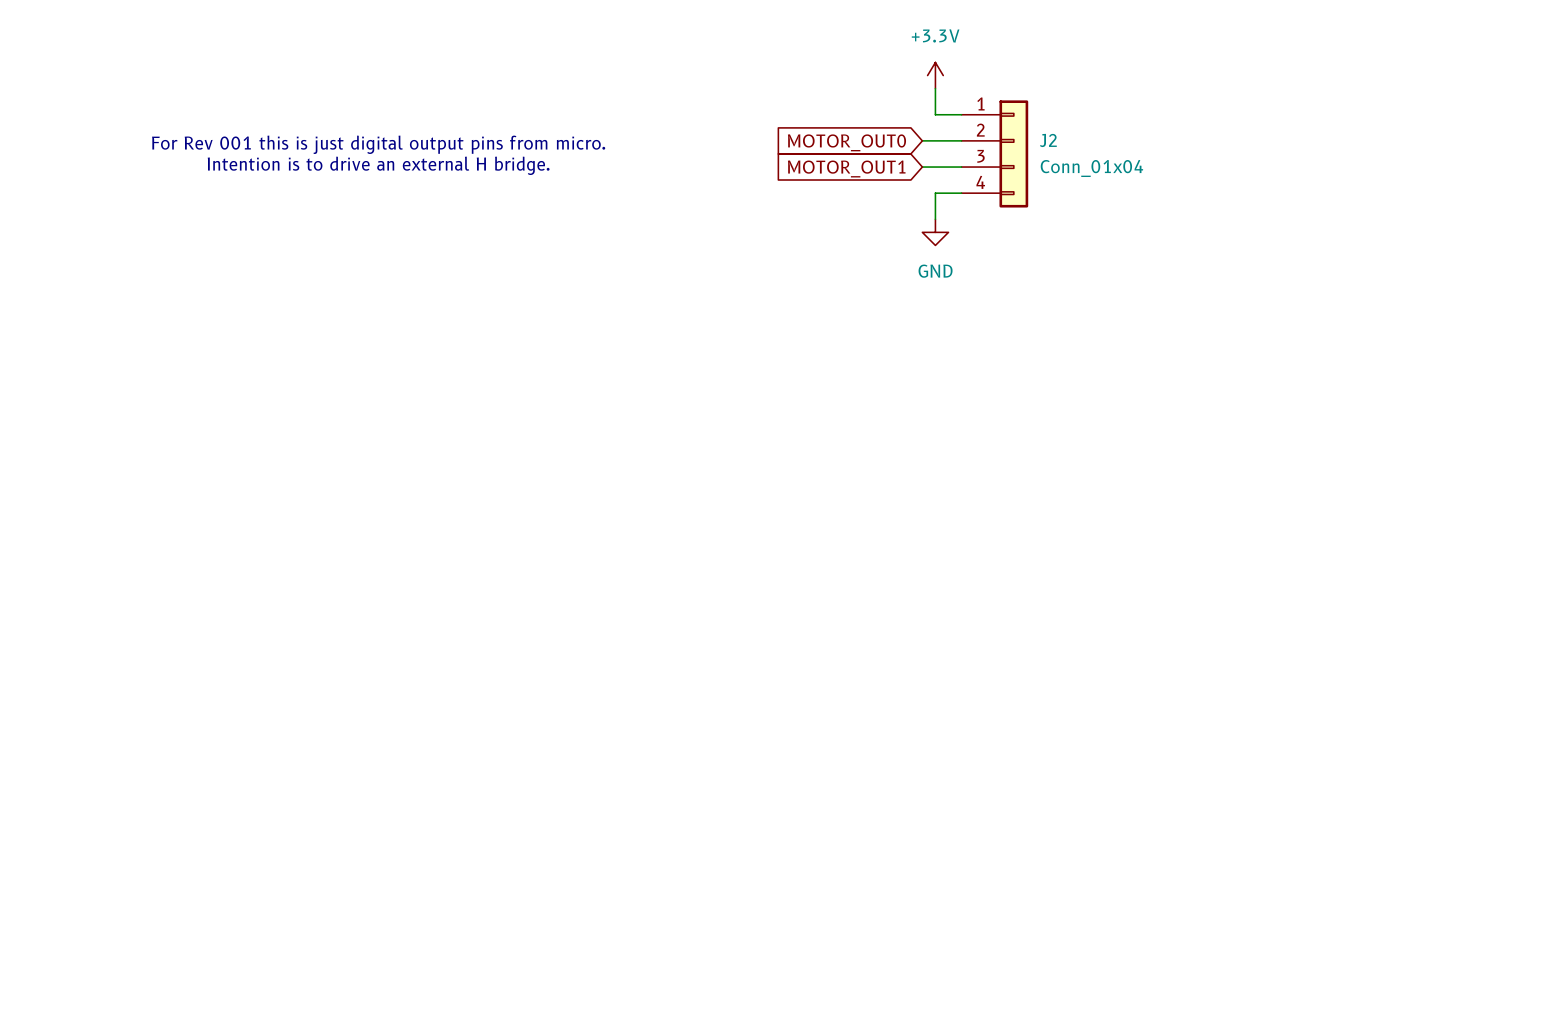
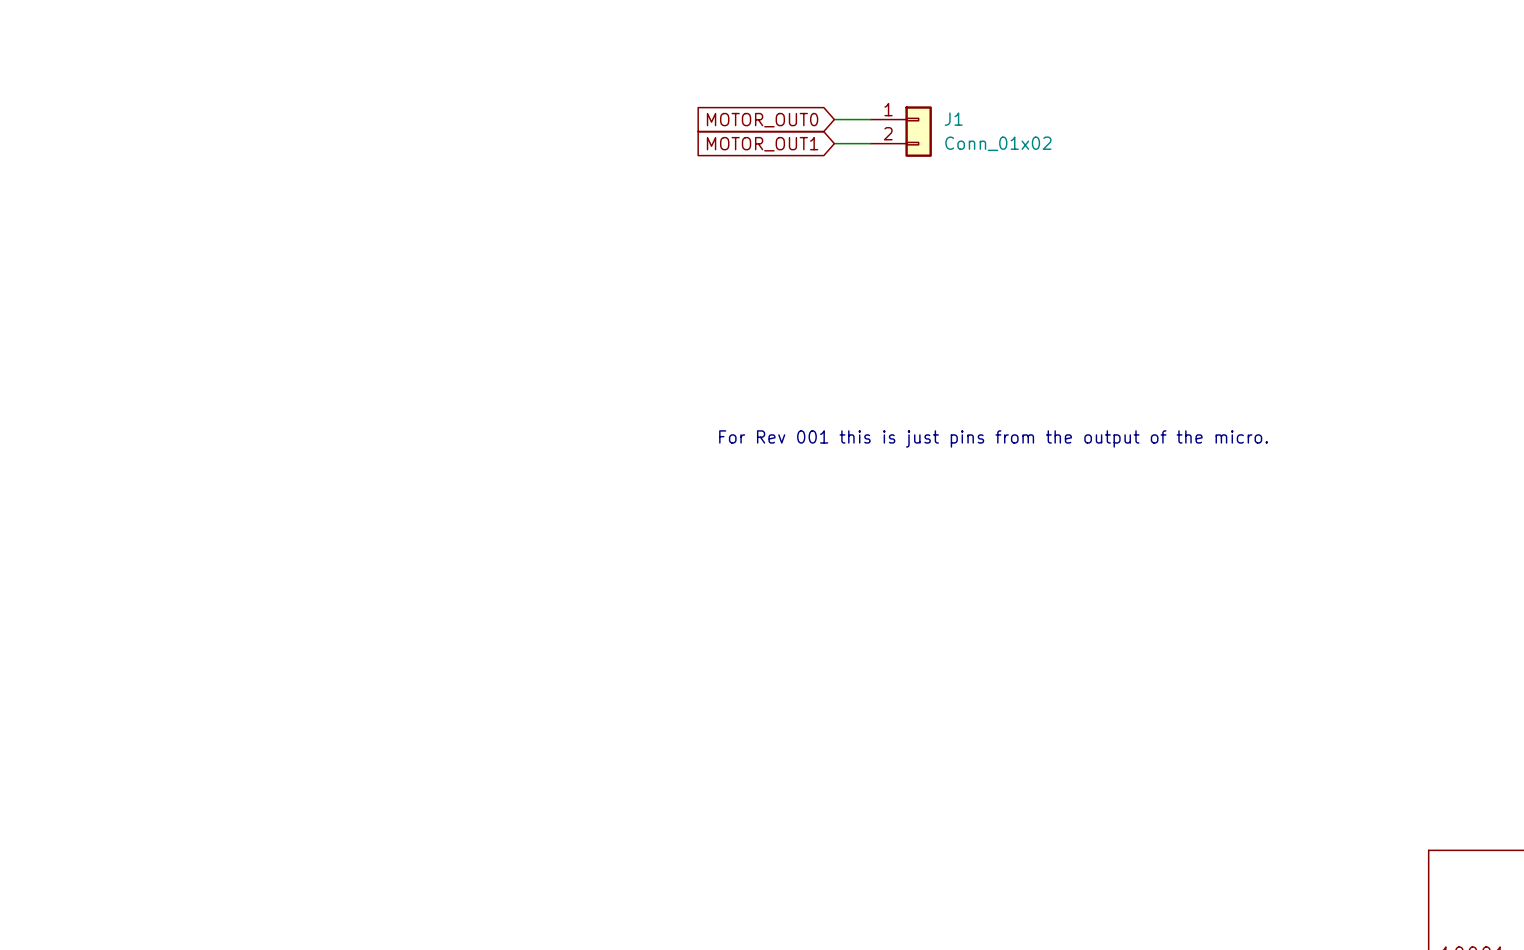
power symbol: +3.3V (935, 75) -> none
wire: (935, 88) (935, 114) (961, 114) -> none
text: For Rev 001 this is just digital output pins from micro. (378, 144) -> none
J2: Conn_01x04 (994, 153) -> none
J1: none -> Conn_01x02 (901, 131)
text: Intention is to drive an external H bridge. (378, 165) -> none
wire: (961, 193) (935, 193) (935, 219) -> none
power symbol: GND (935, 232) -> none
text: none -> For Rev 001 this is just pins from the output of the micro. (993, 438)

